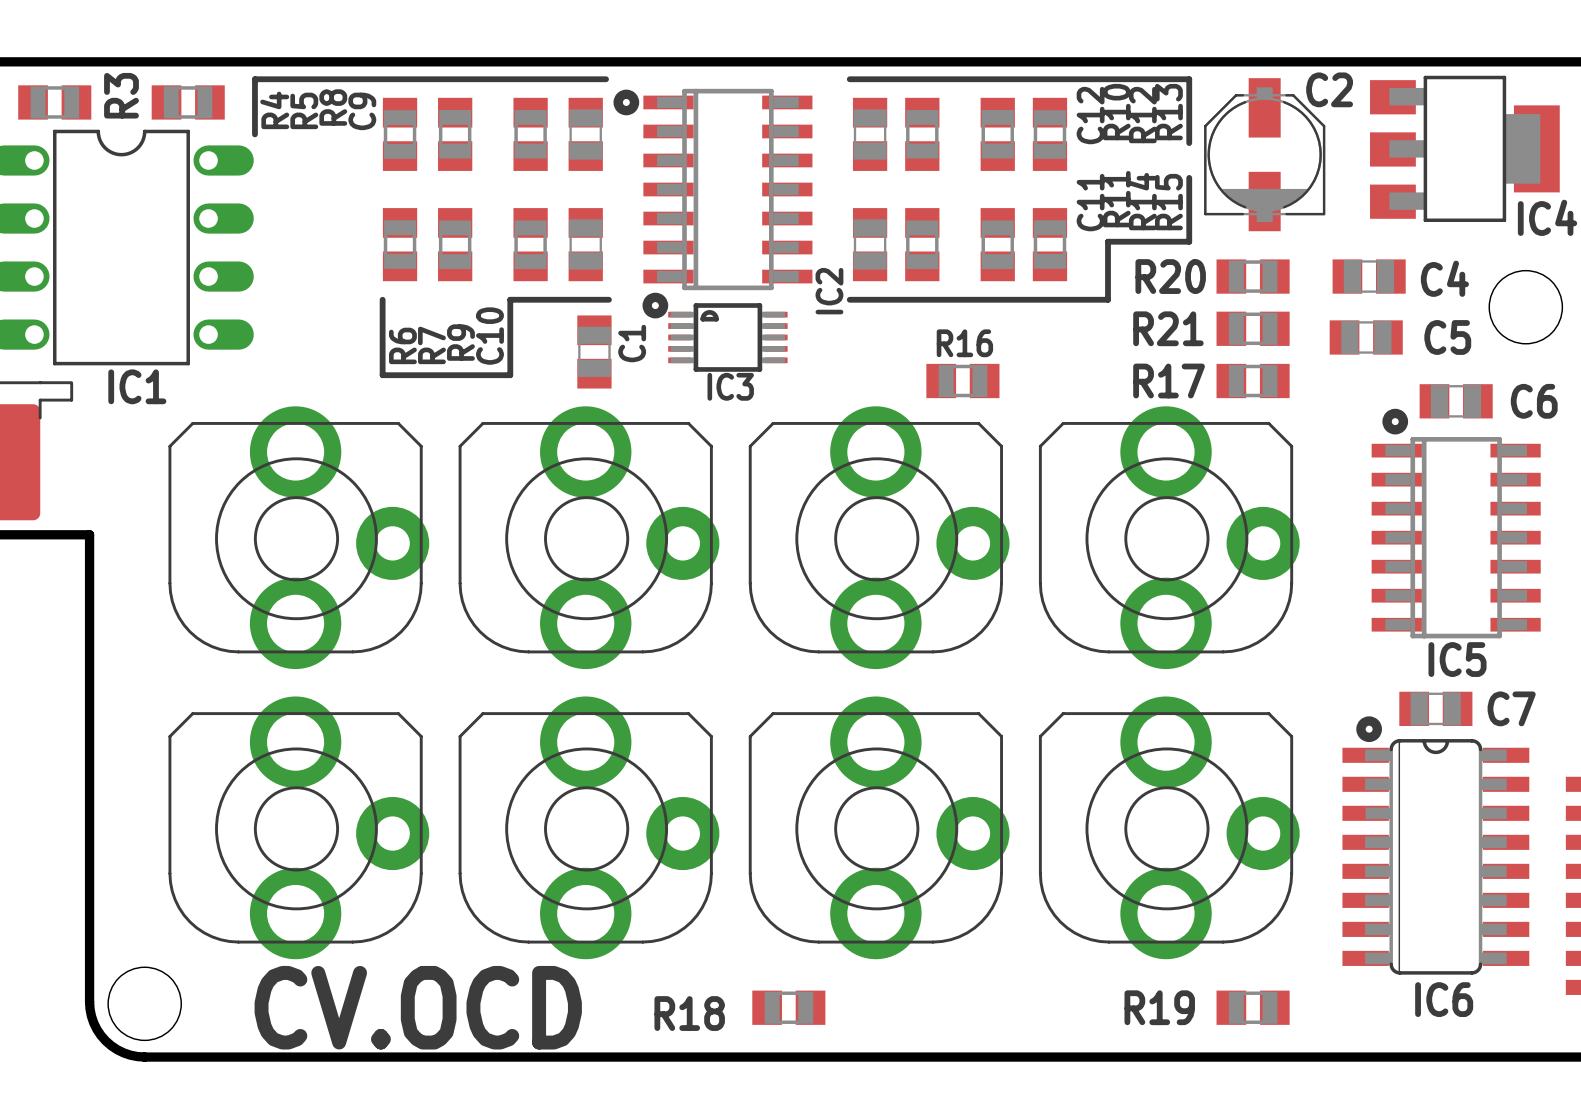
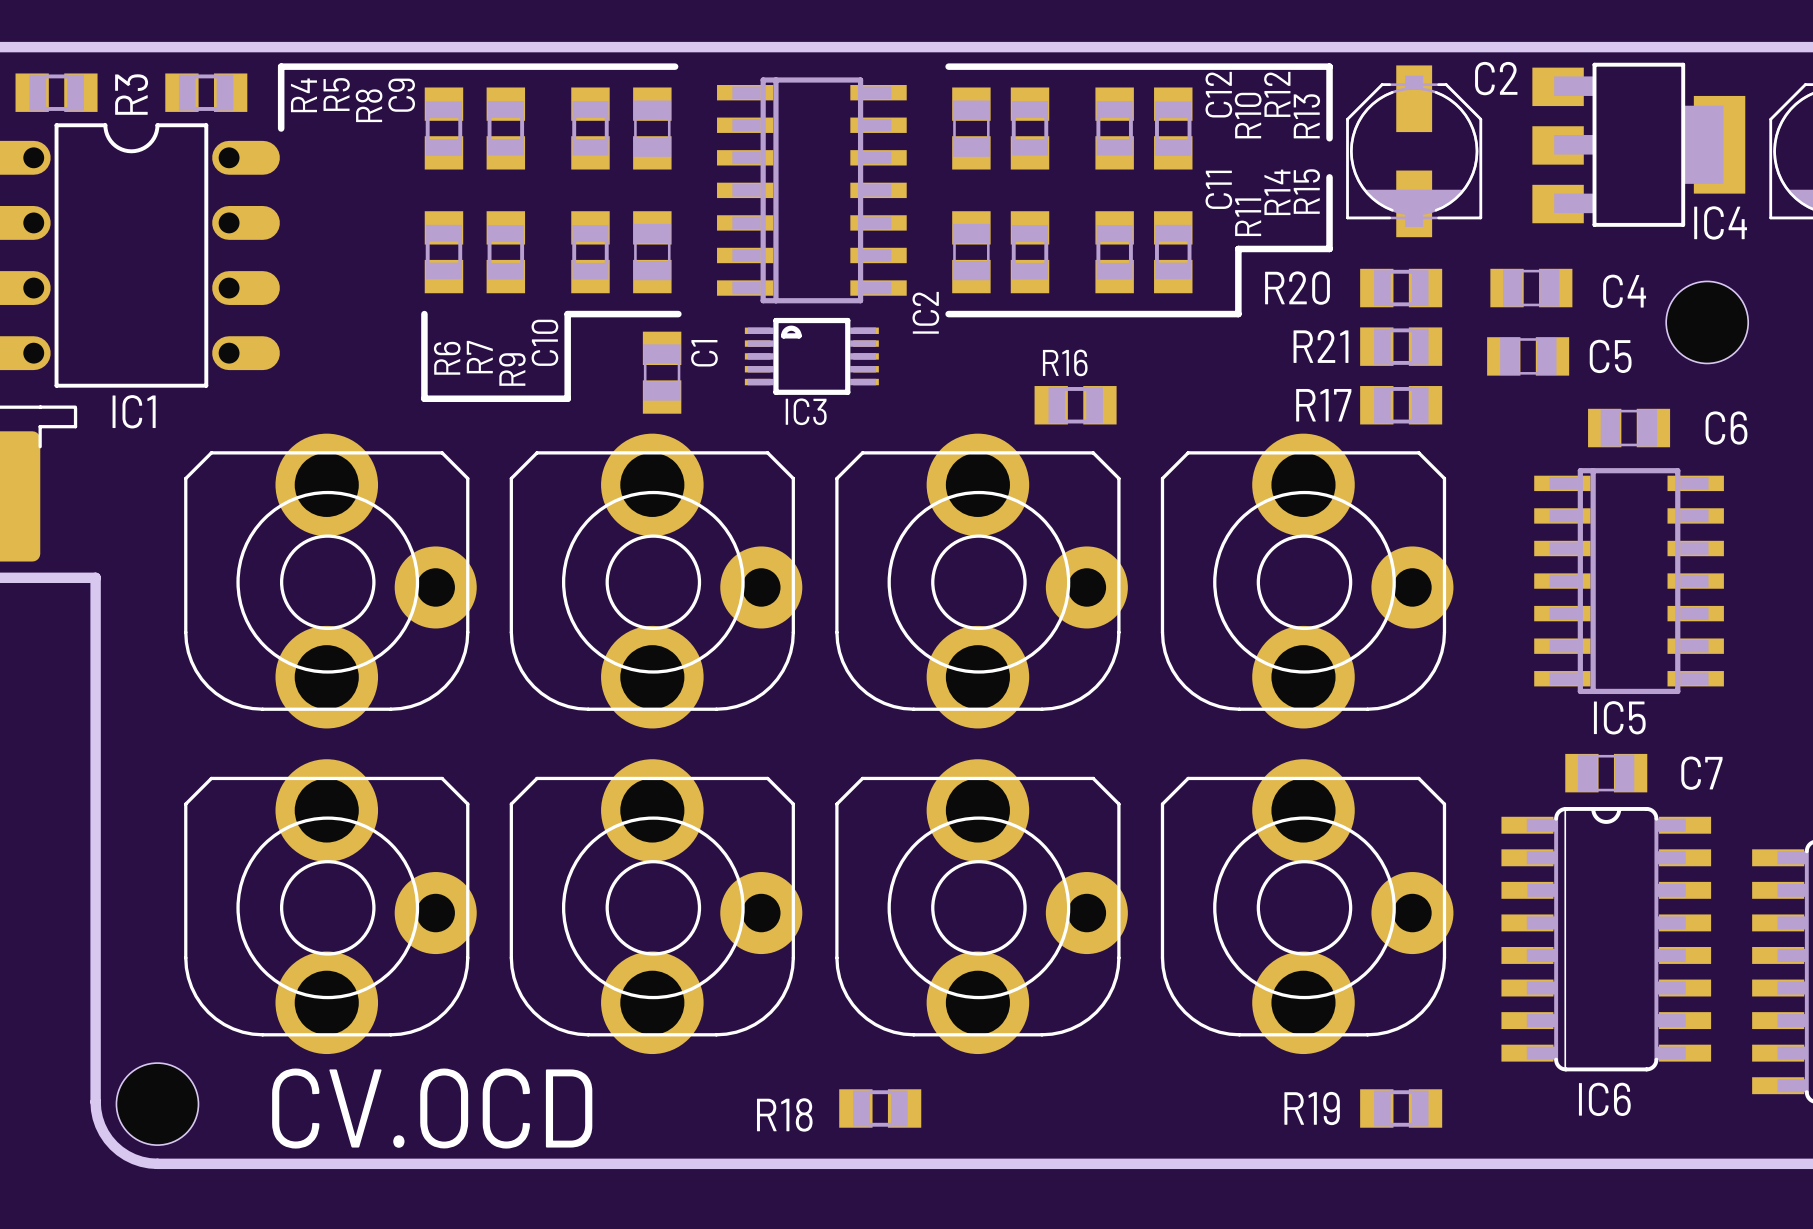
drawing: [613, 89, 640, 116] -> none
drawing: [642, 292, 669, 319] -> none
drawing: [1382, 408, 1409, 435] -> none
drawing: [1356, 716, 1382, 743] -> none

